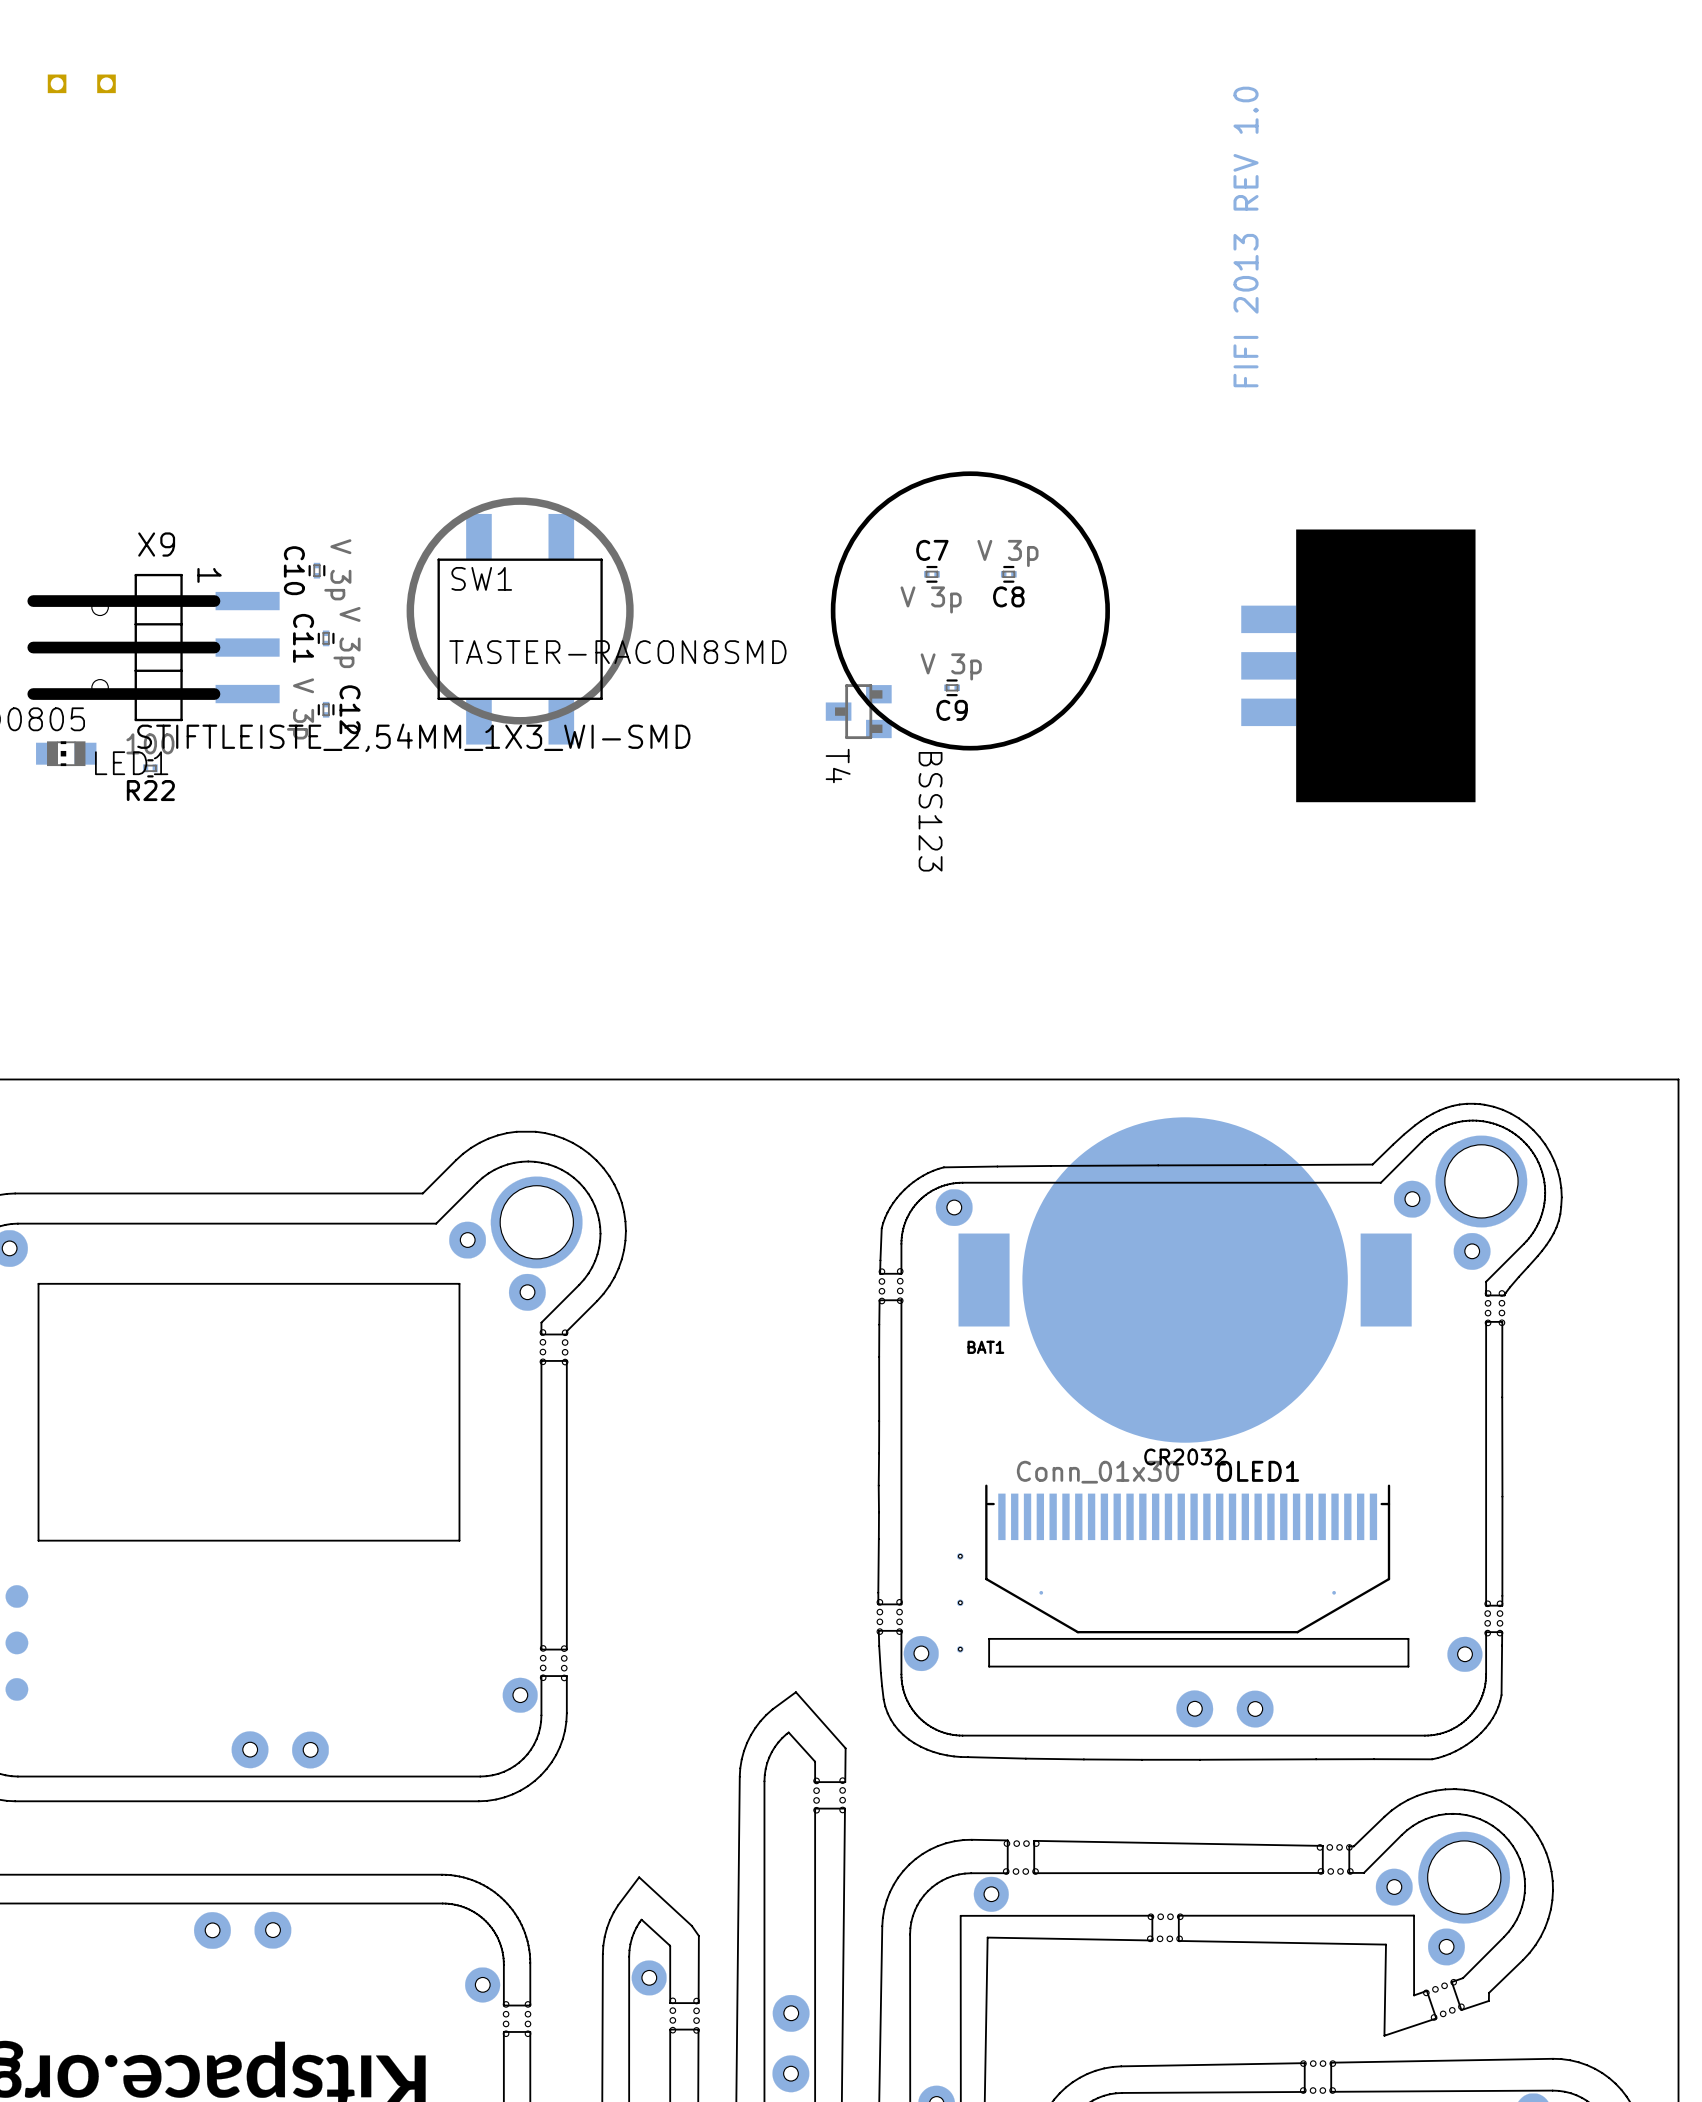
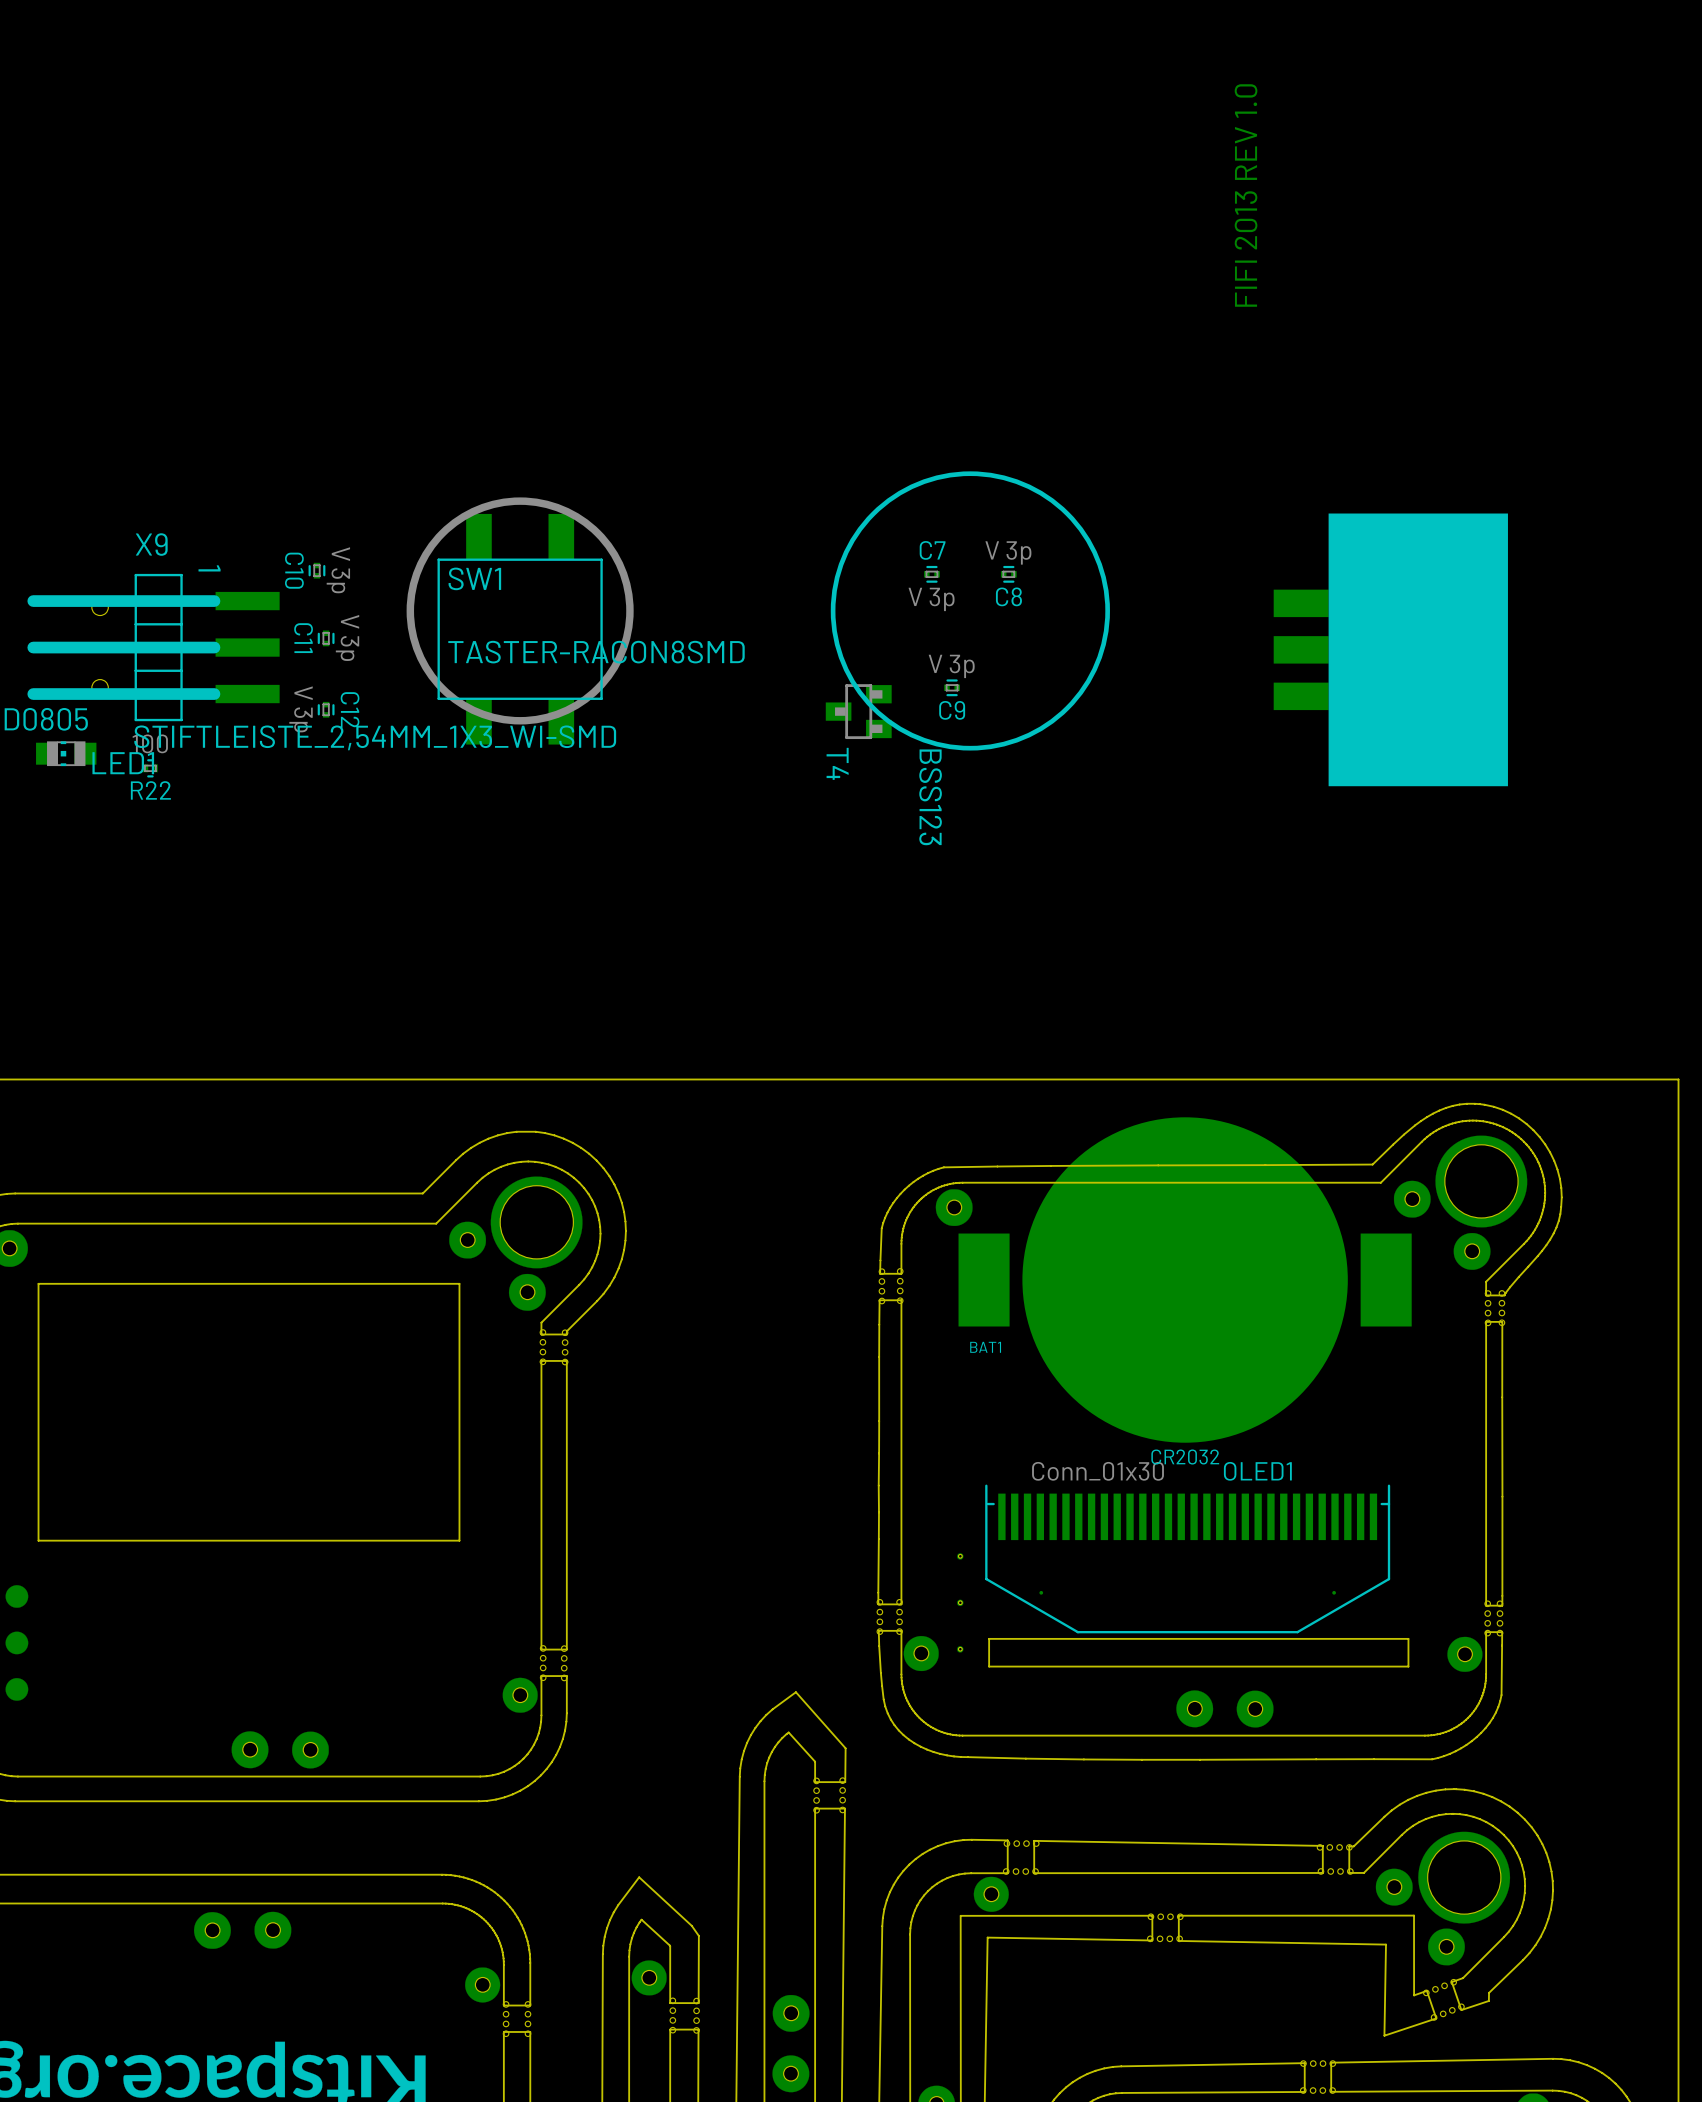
part: (57, 83) -> none
part: (106, 83) -> none
part position: (1358, 665) -> (1390, 649)

